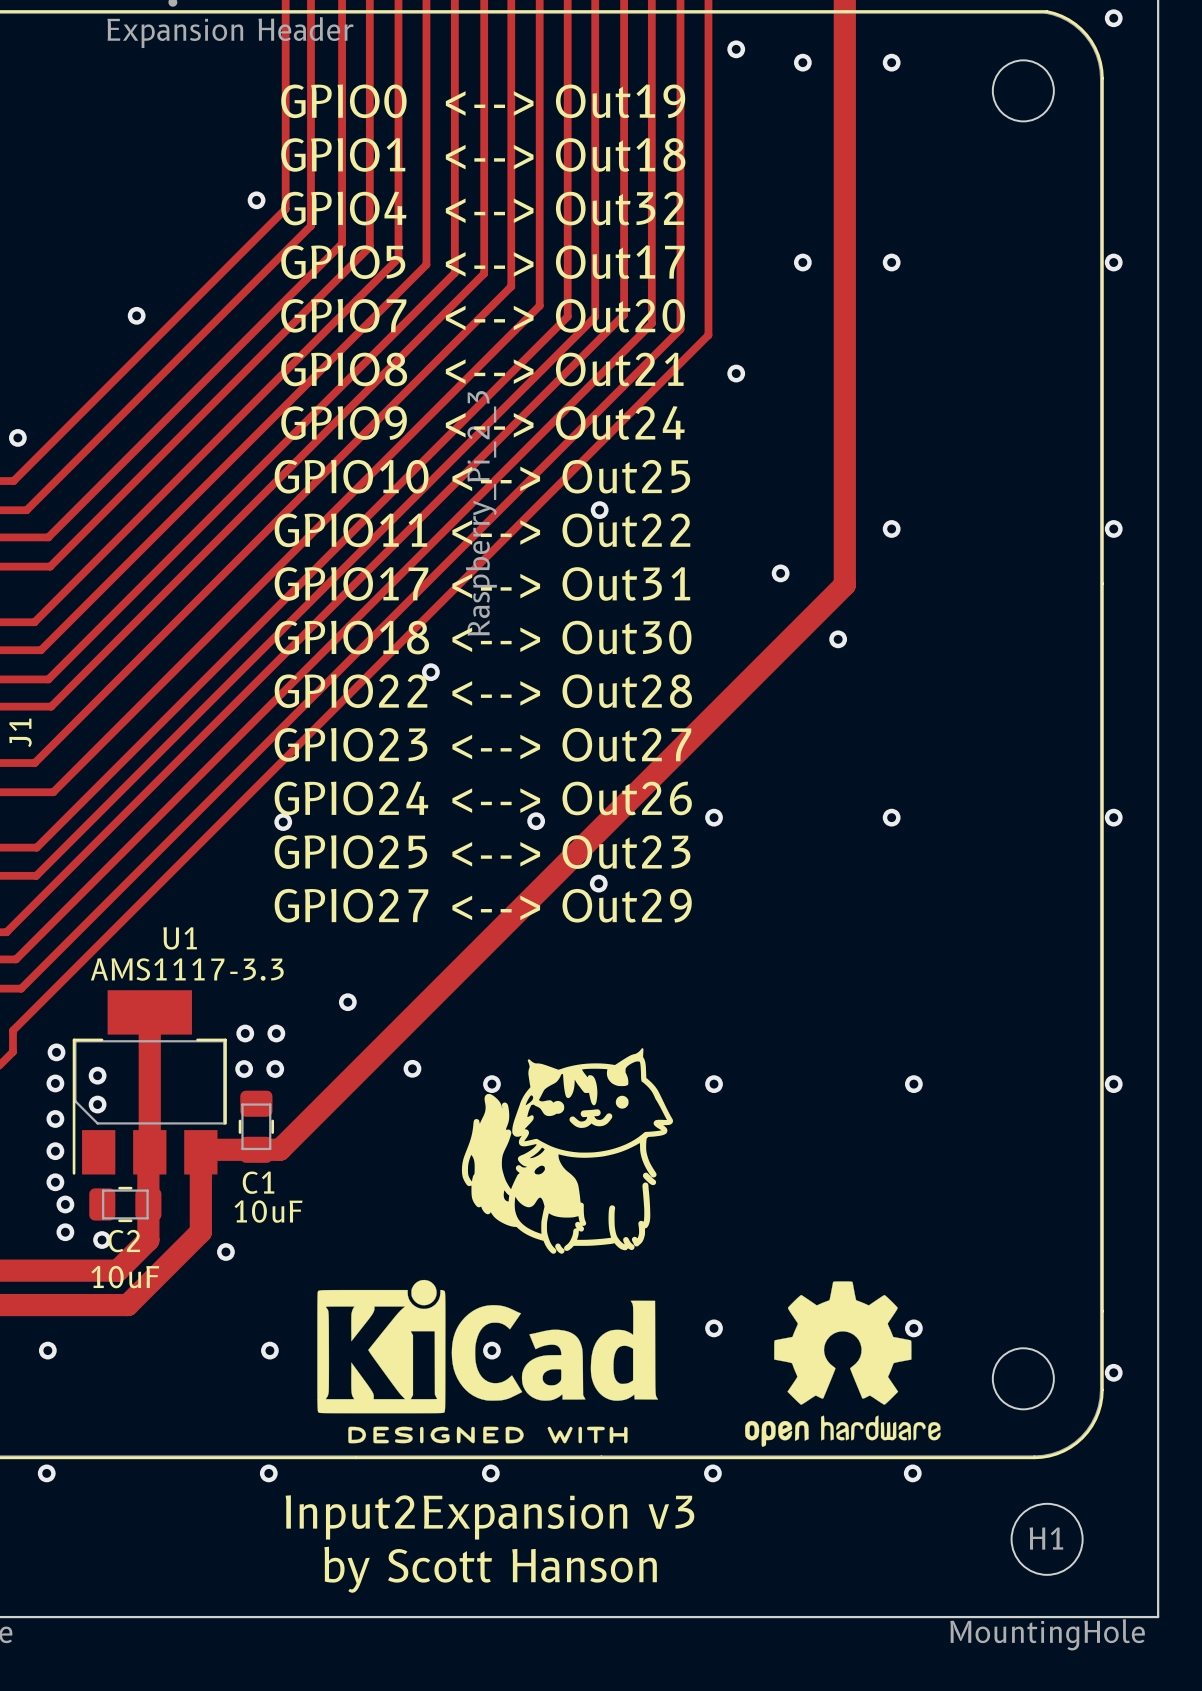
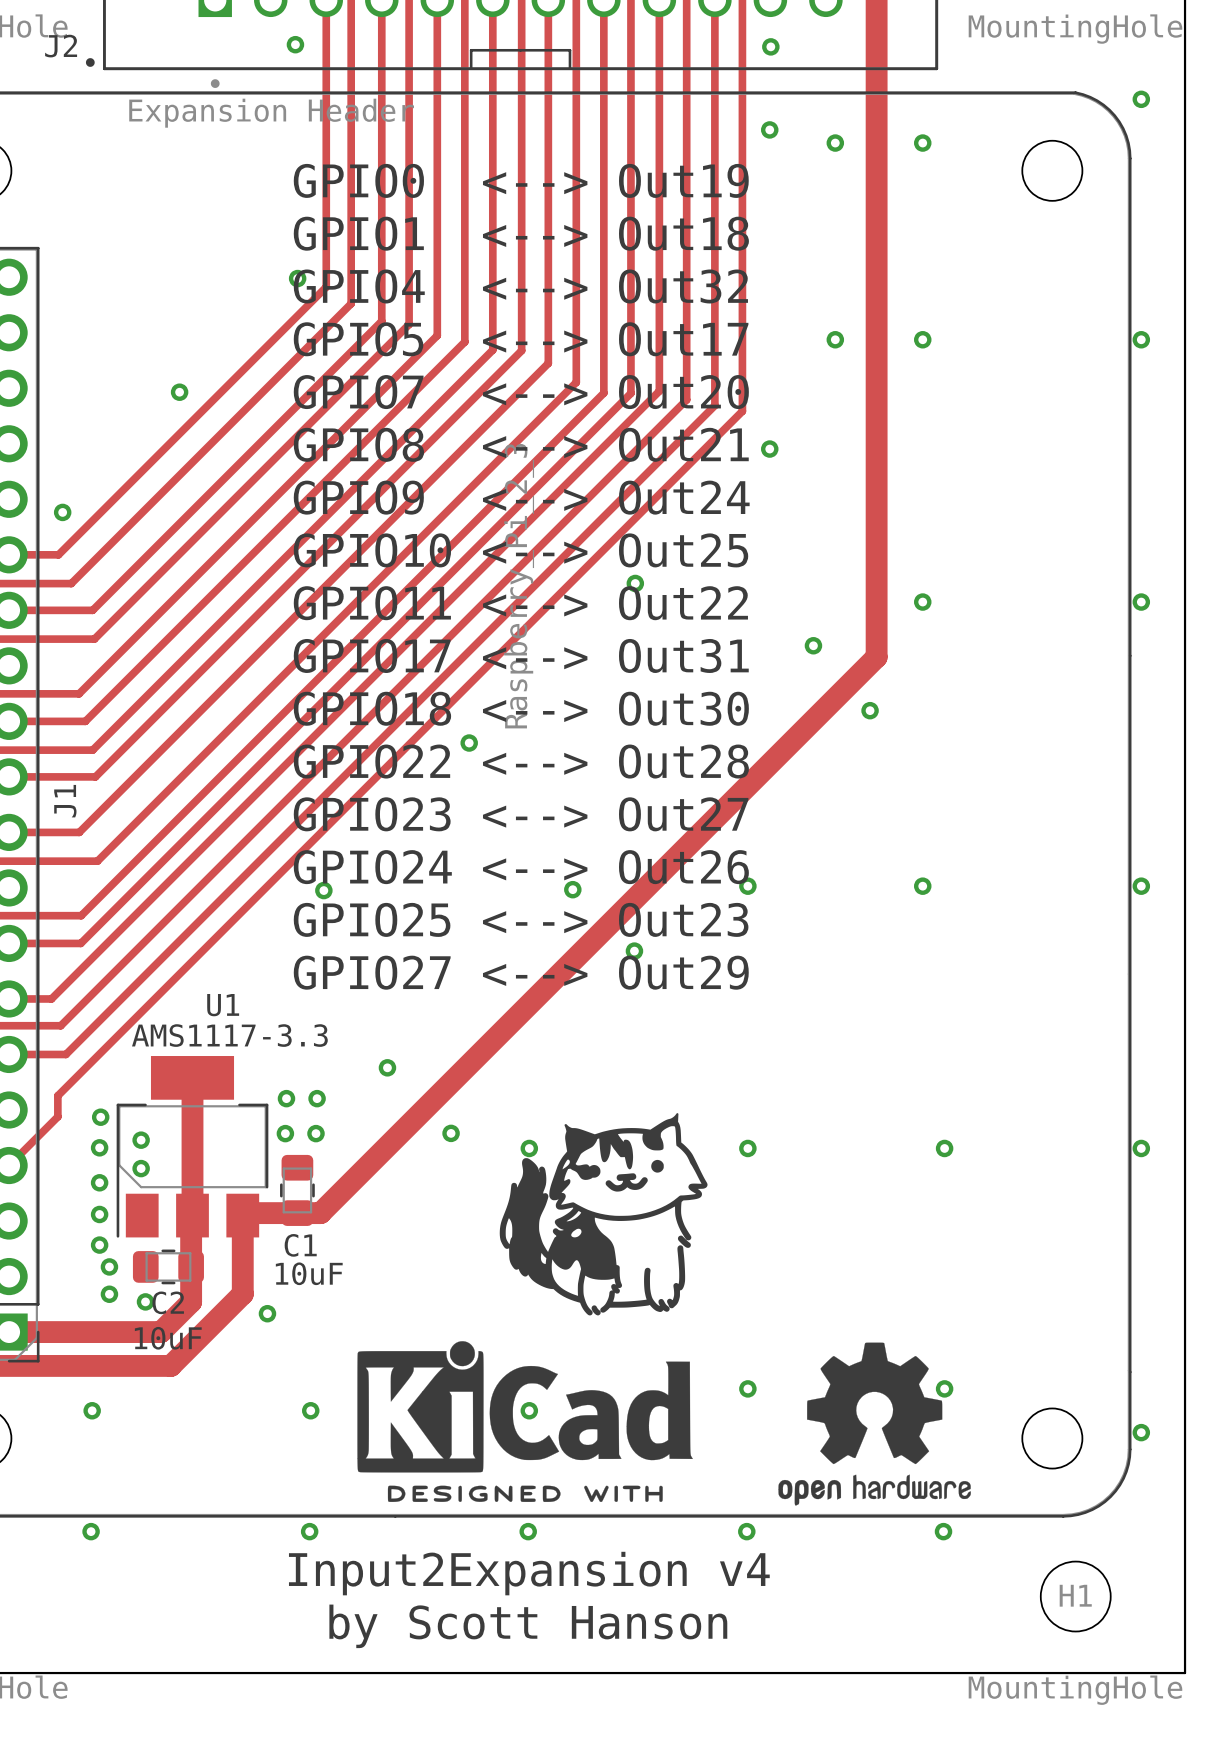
text: Input2Expansion v3 (489, 1517) -> Input2Expansion v4 (529, 1573)

